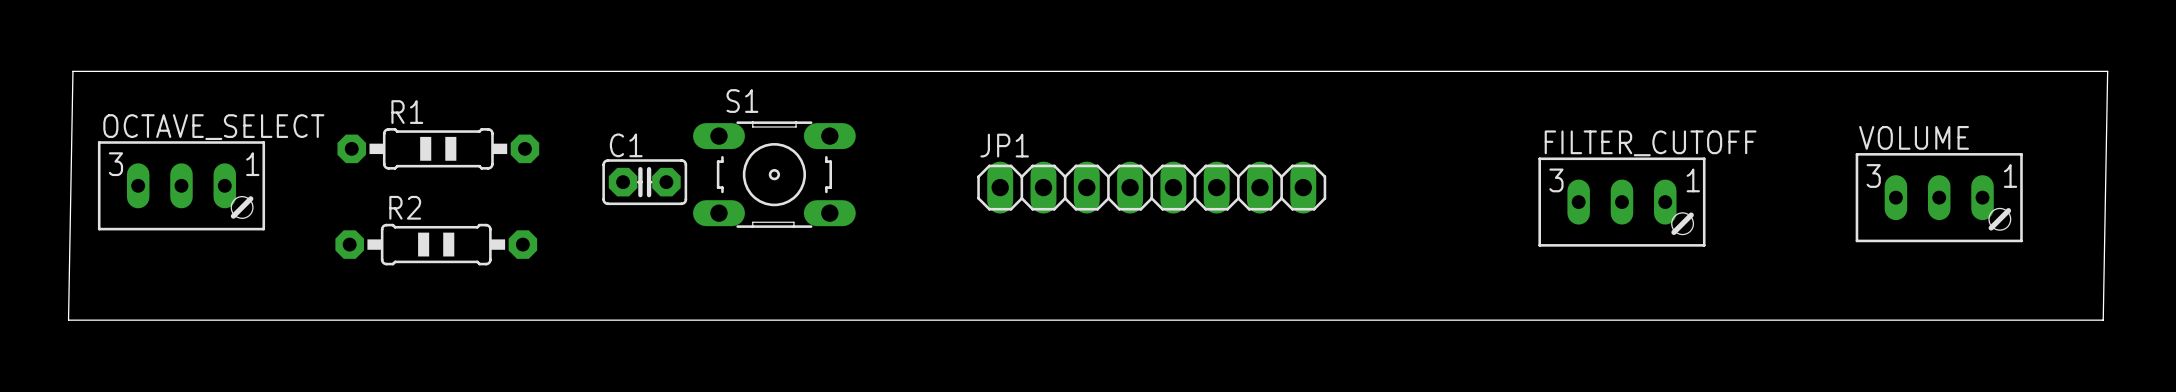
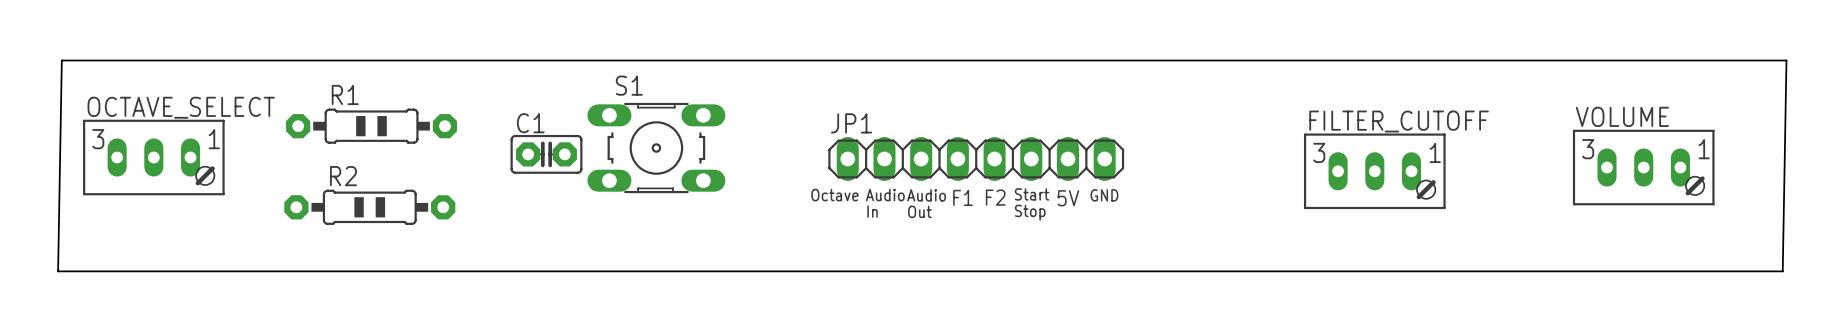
text: none -> Start (1032, 194)
text: none -> Octave (834, 195)
text: none -> Audio (885, 195)
text: none -> Audio (926, 195)
text: none -> GND (1104, 195)
text: none -> F1 (963, 197)
text: none -> F2 (995, 197)
text: none -> 5V (1068, 198)
text: none -> In (872, 211)
text: none -> Out (919, 211)
text: none -> Stop (1030, 212)

